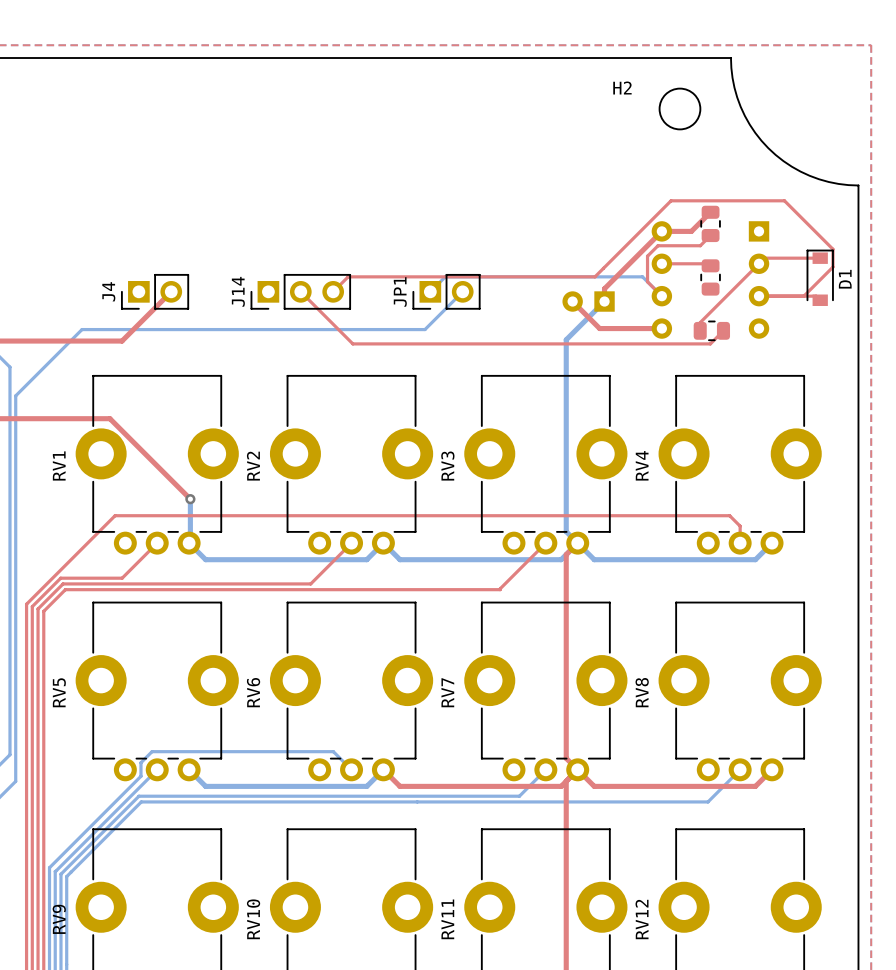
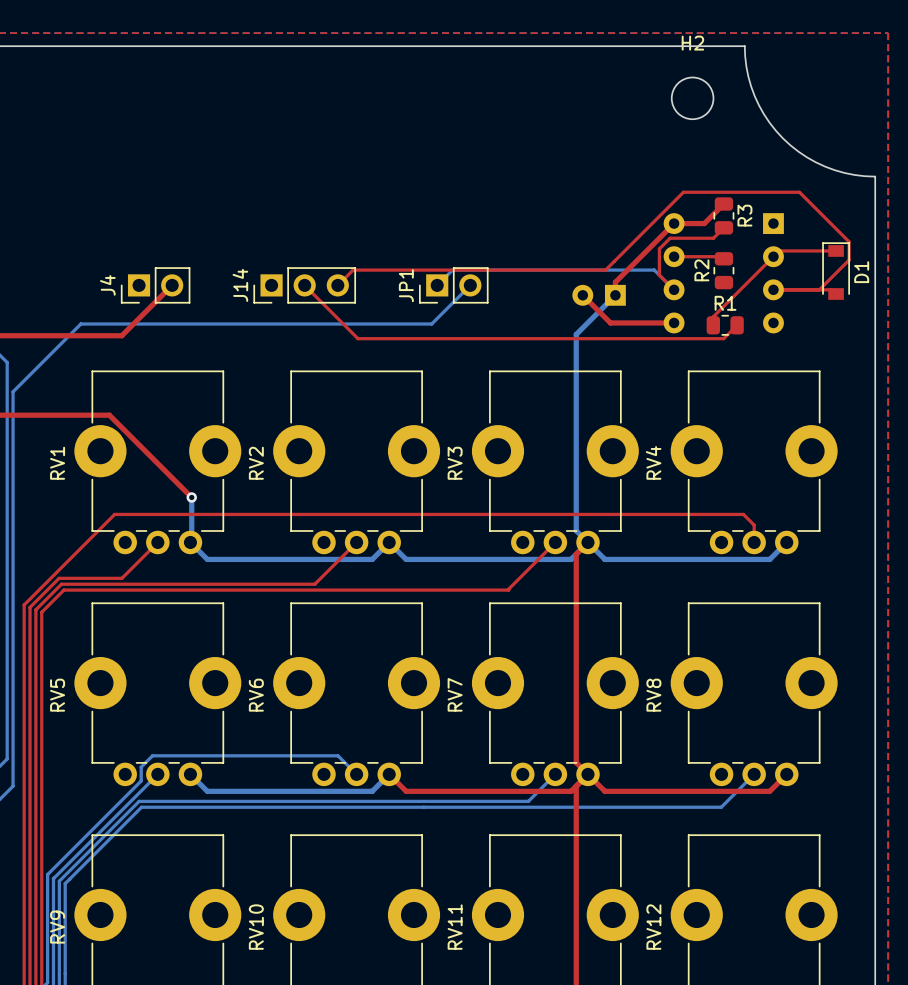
H2 name position: H2 (622, 88) -> H2 (692, 43)
R3 name: none -> R3 (744, 215)
R2 name: none -> R2 (701, 270)
R1 name: none -> R1 (725, 303)

